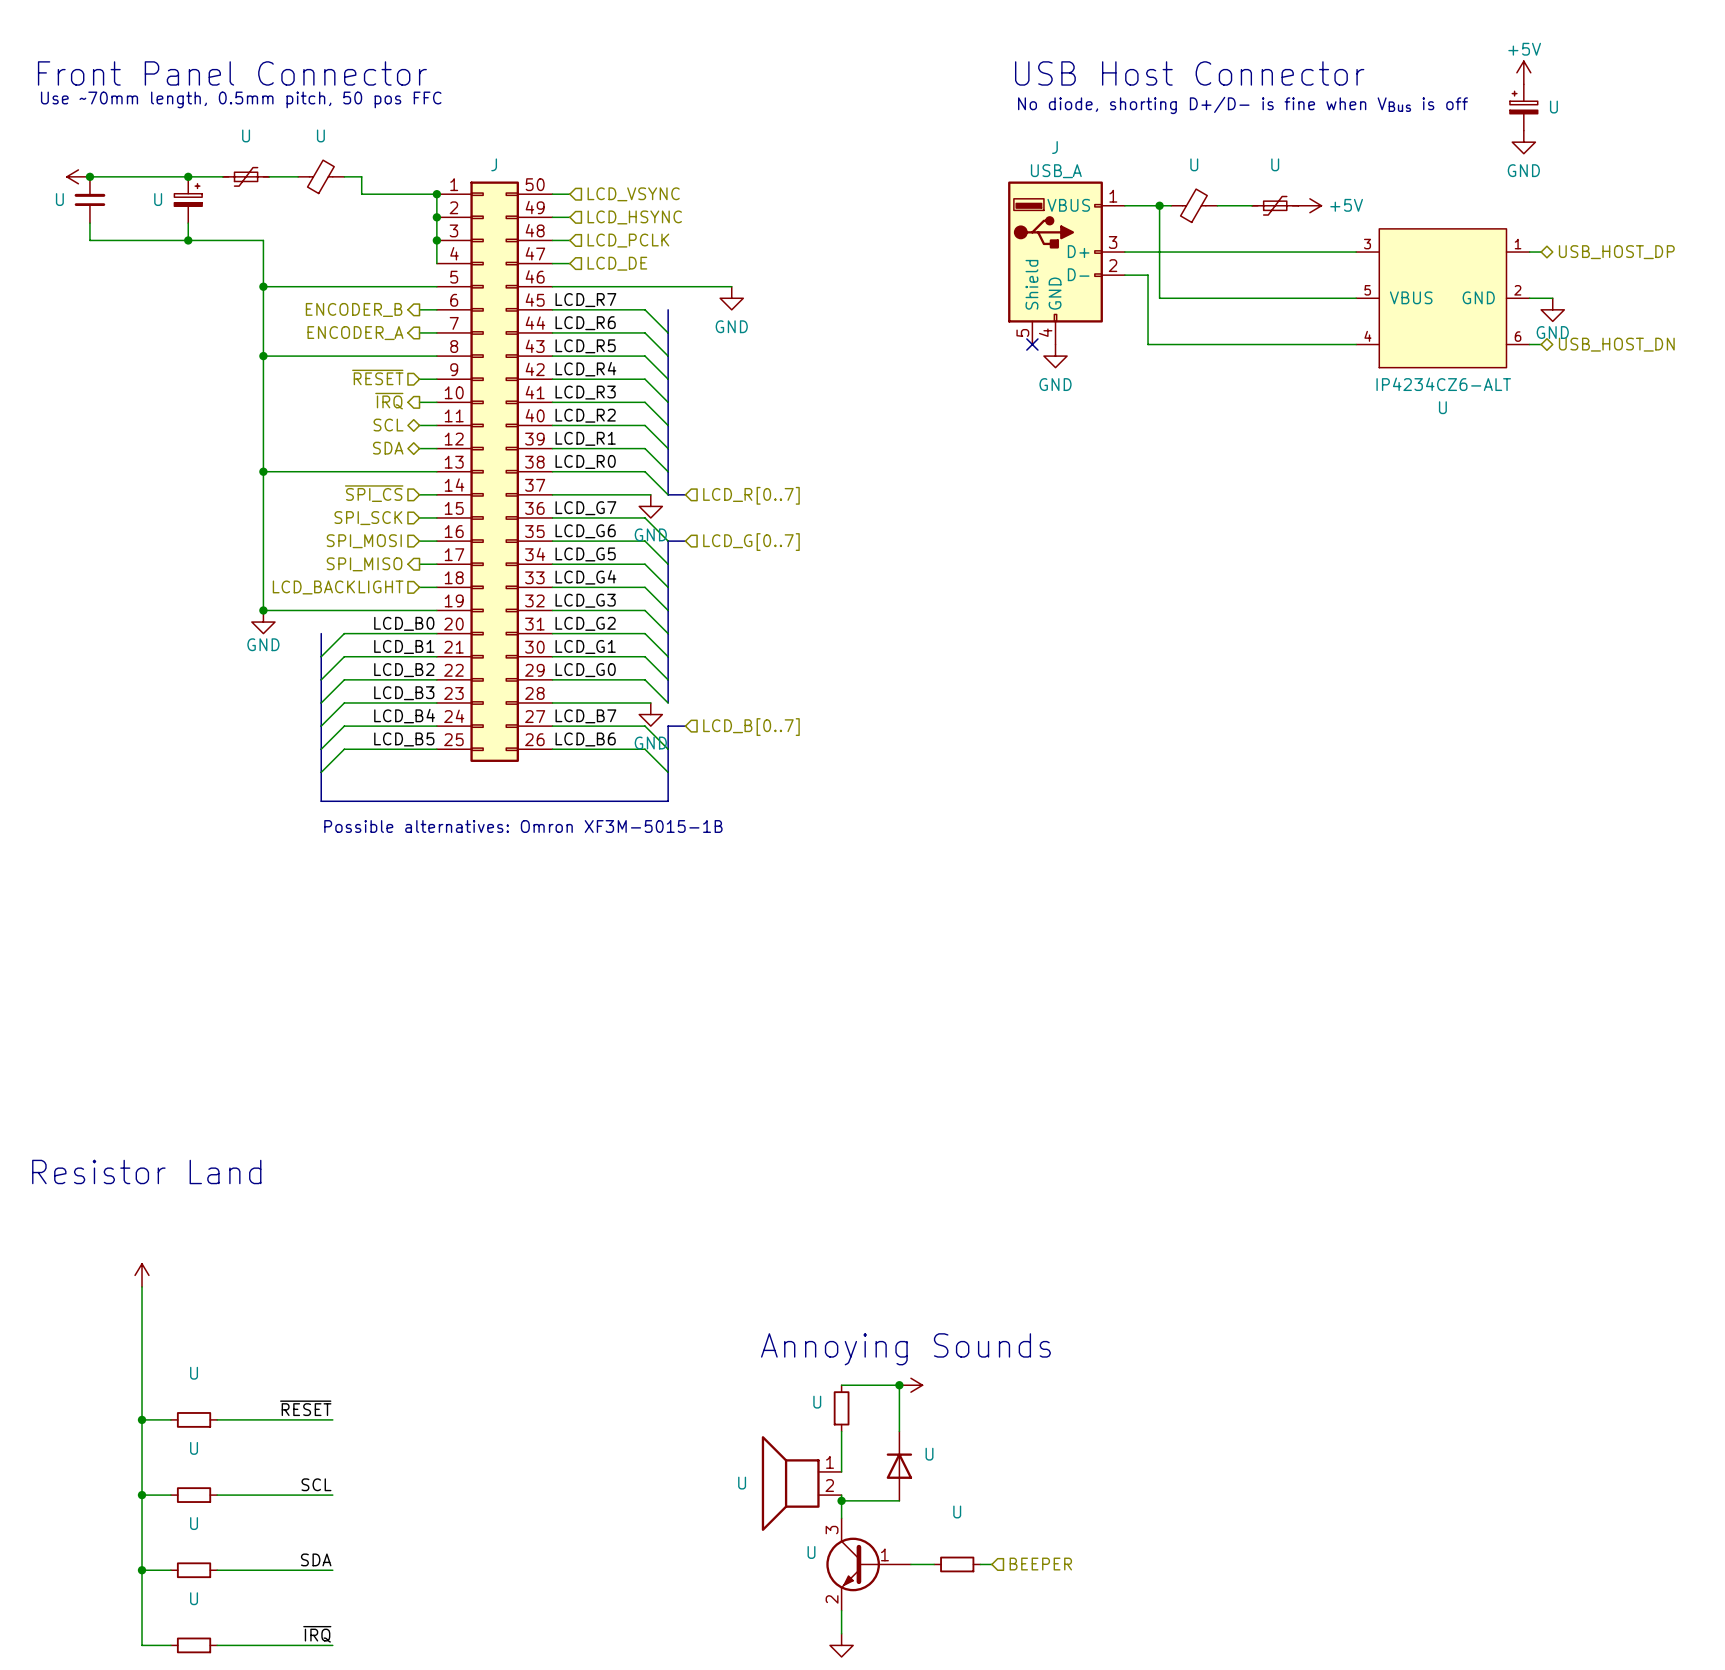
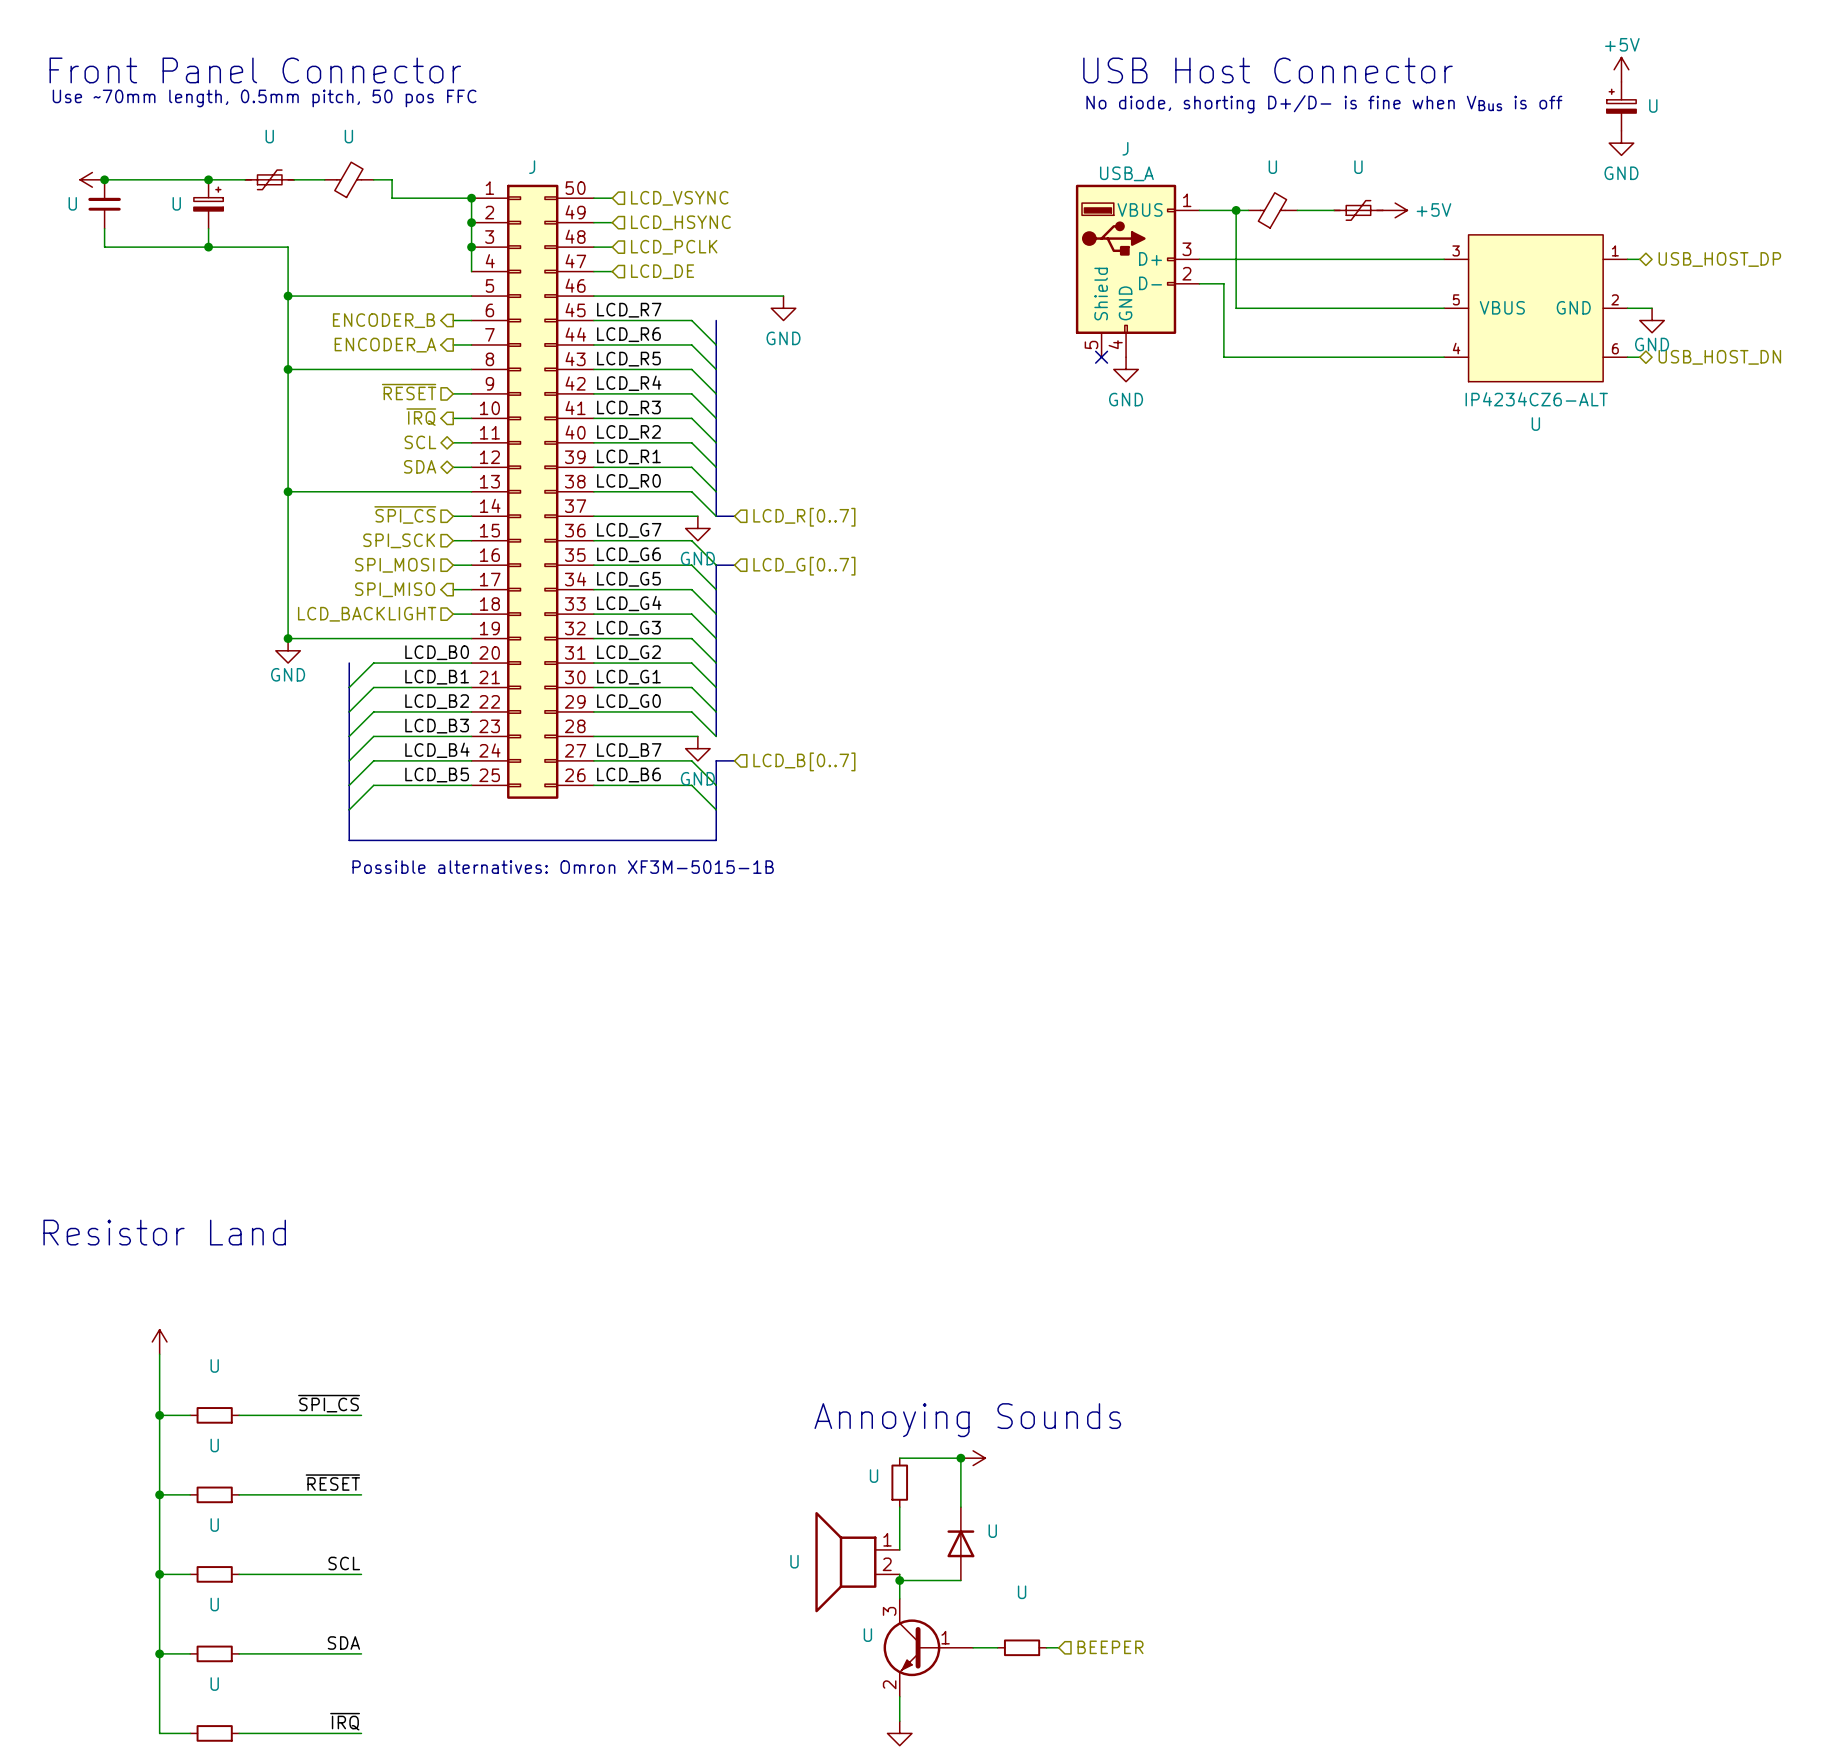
label: none -> ~{SPI_CS} (329, 1403)
wire: none -> (159, 1415) (190, 1415)
junction: none -> (159, 1415)
U: none -> (214, 1415)
wire: none -> (239, 1415) (361, 1415)

